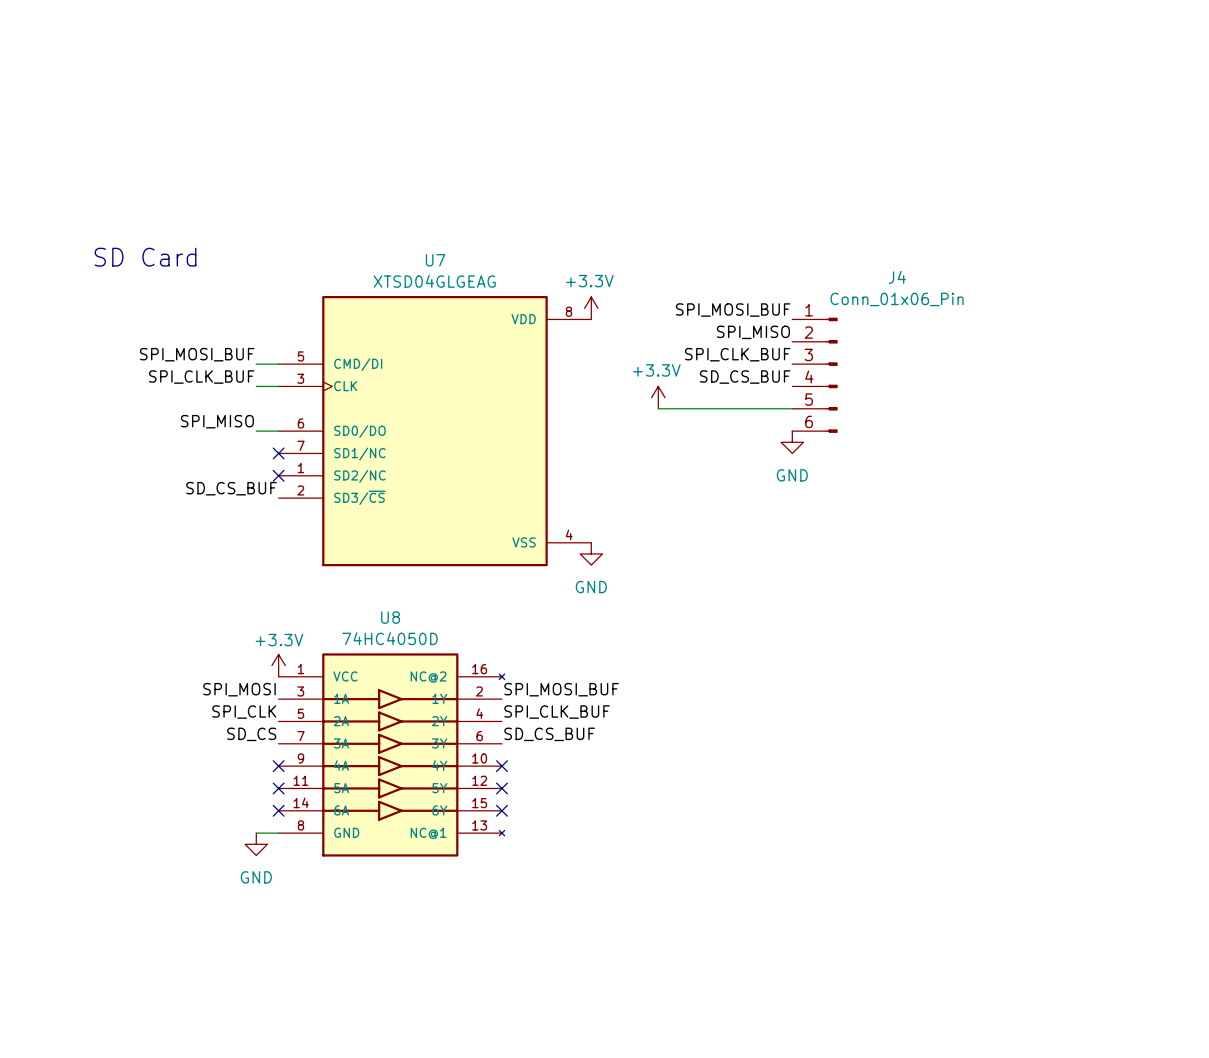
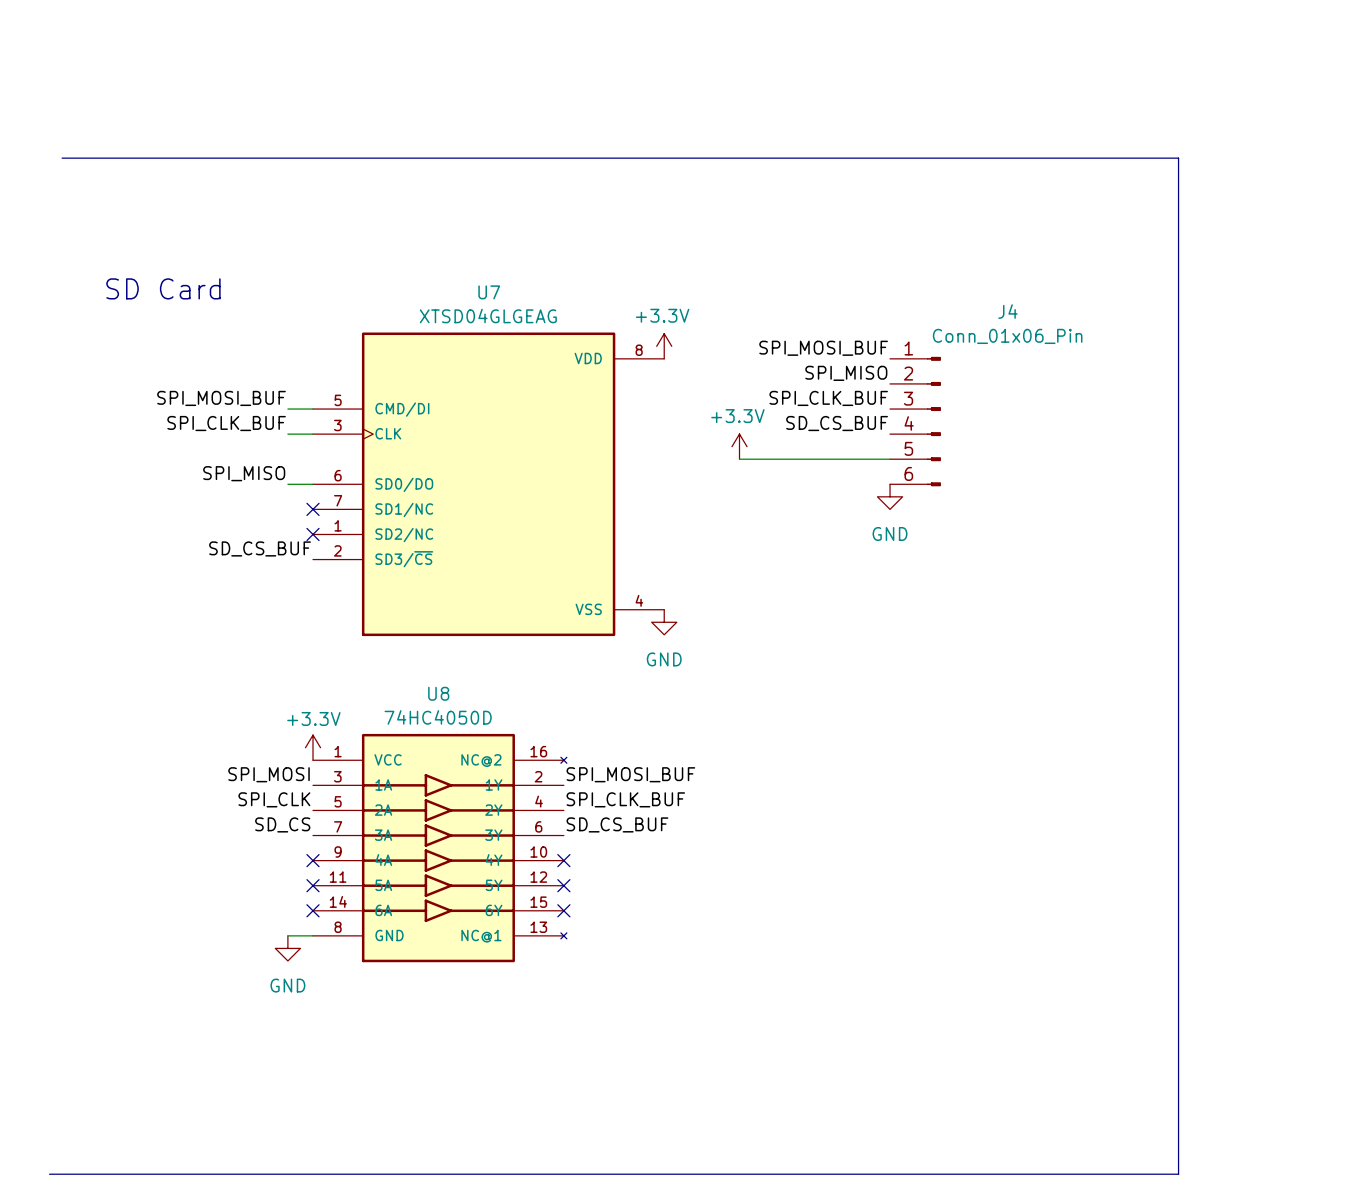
bus: none -> (62, 158) (1178, 158) (1178, 1174) (49, 1174)

